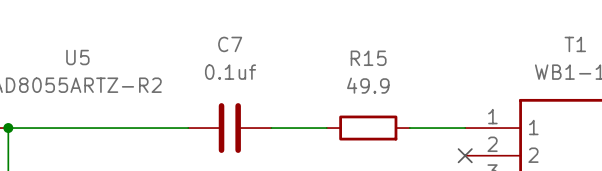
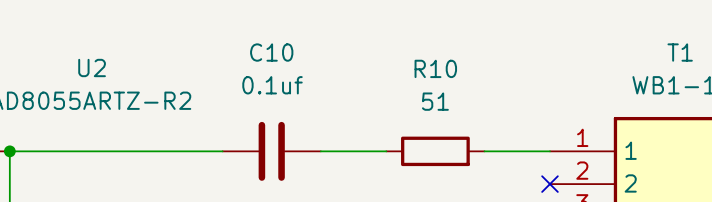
C7 name: C7 (230, 44) -> C10 (271, 52)
U5 name: U5 (77, 57) -> U2 (92, 67)
R15 name: R15 (368, 58) -> R10 (435, 68)
R15 value: 49.9 (368, 85) -> 51 (435, 101)

